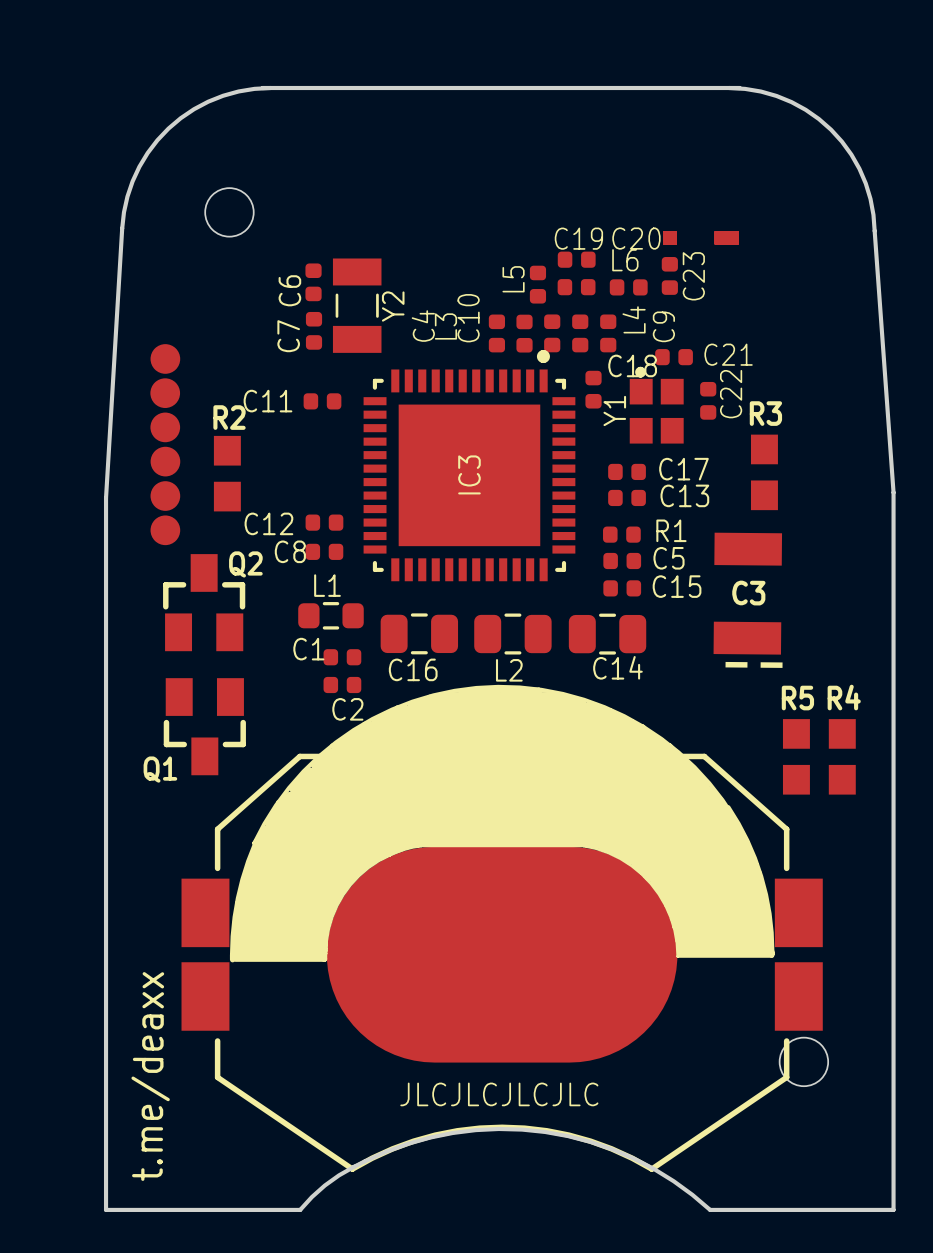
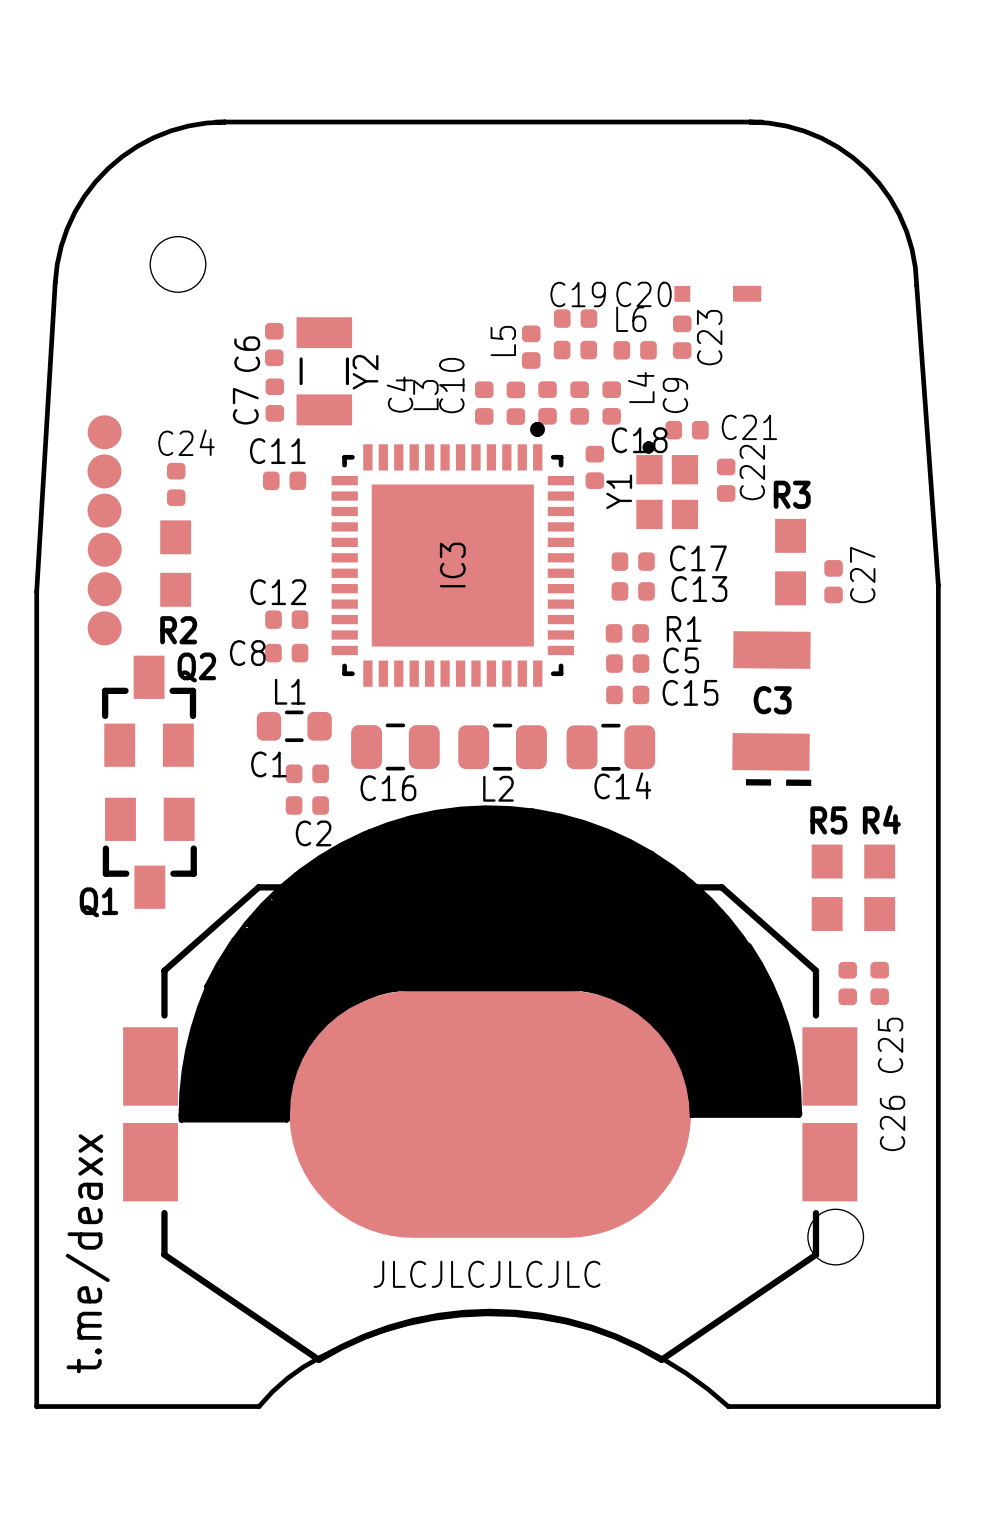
C11 name position: C11 (267, 401) -> C11 (277, 451)
C24: none -> (176, 484)
R2 name position: R2 (229, 417) -> R2 (178, 630)
C27: none -> (833, 581)
C12 name position: C12 (268, 523) -> C12 (278, 592)
C25: none -> (847, 983)
C26: none -> (879, 983)

